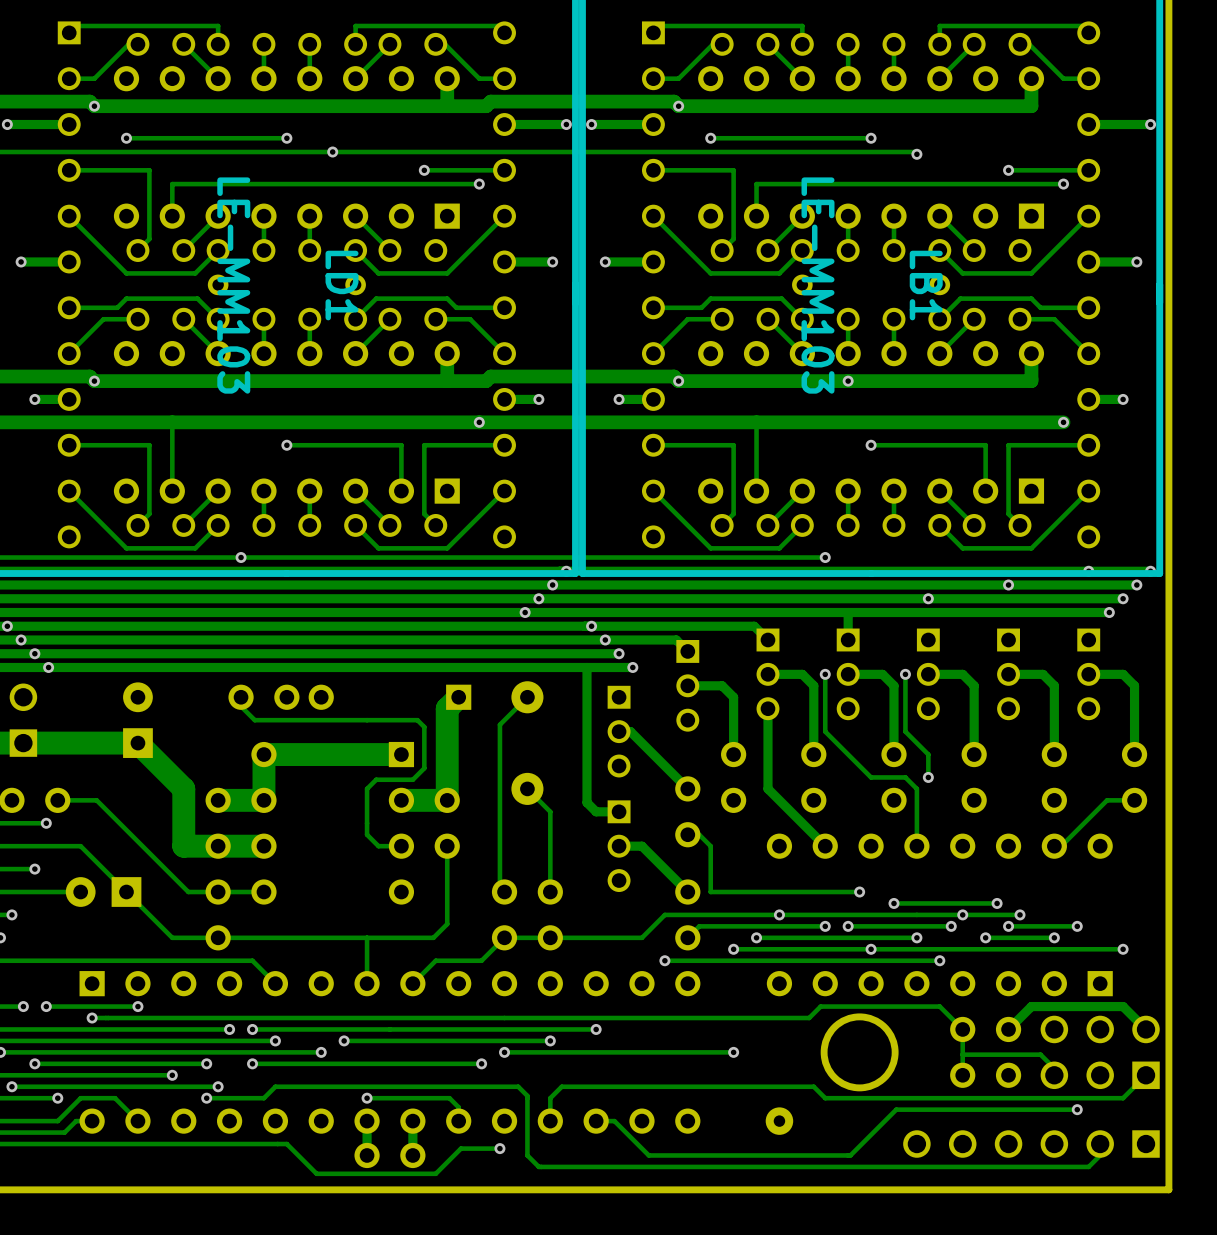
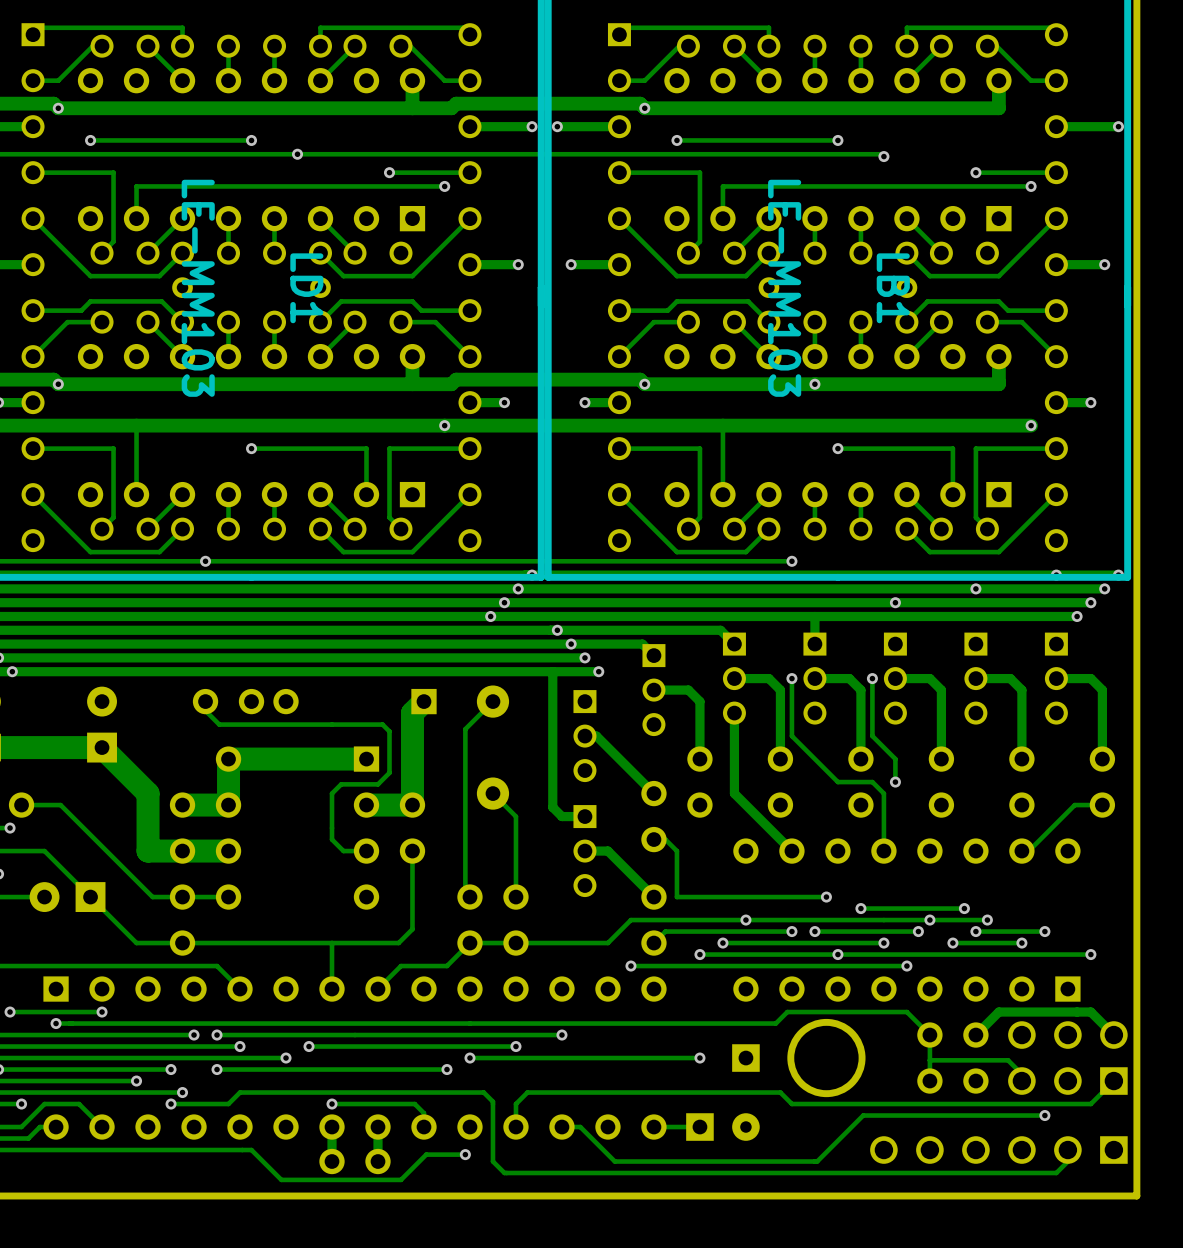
part: none -> (745, 1058)
track: none -> (699, 1127) (653, 1127)
part: none -> (699, 1127)

